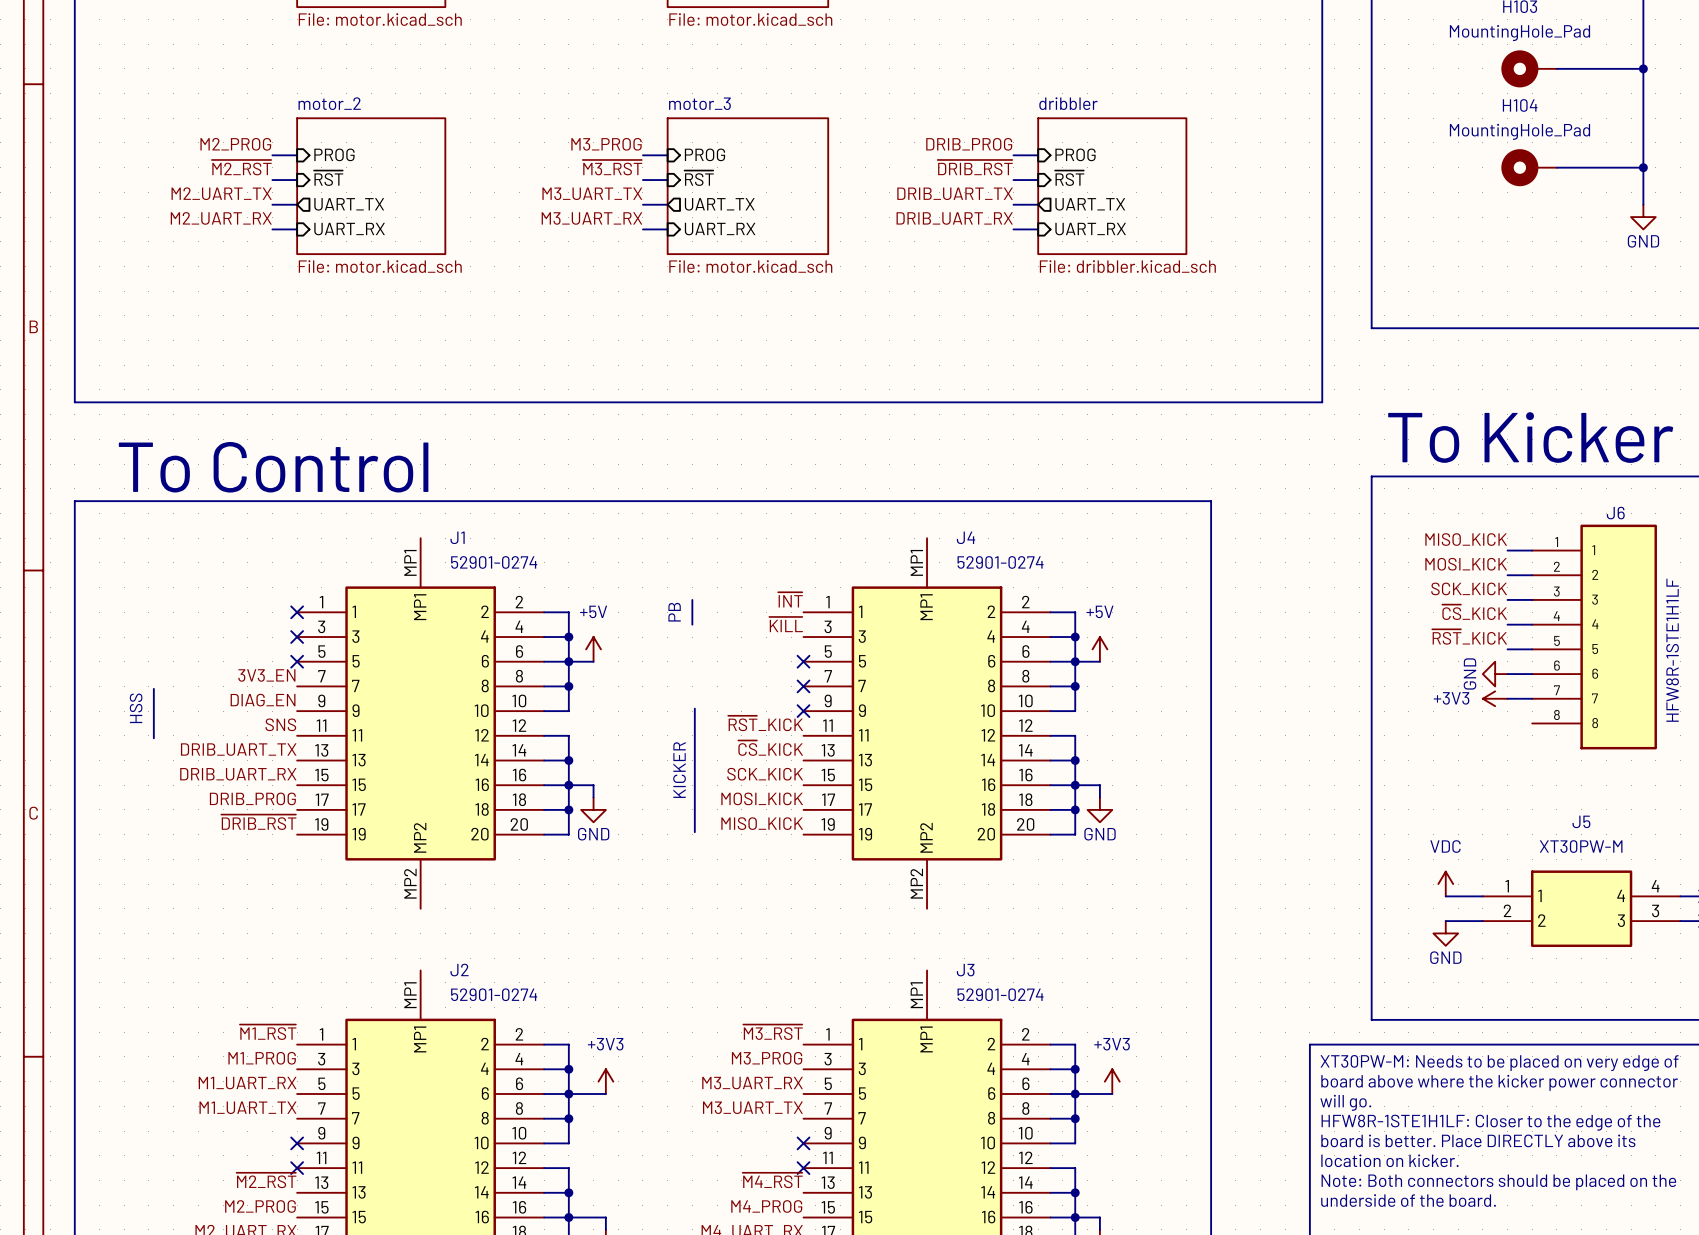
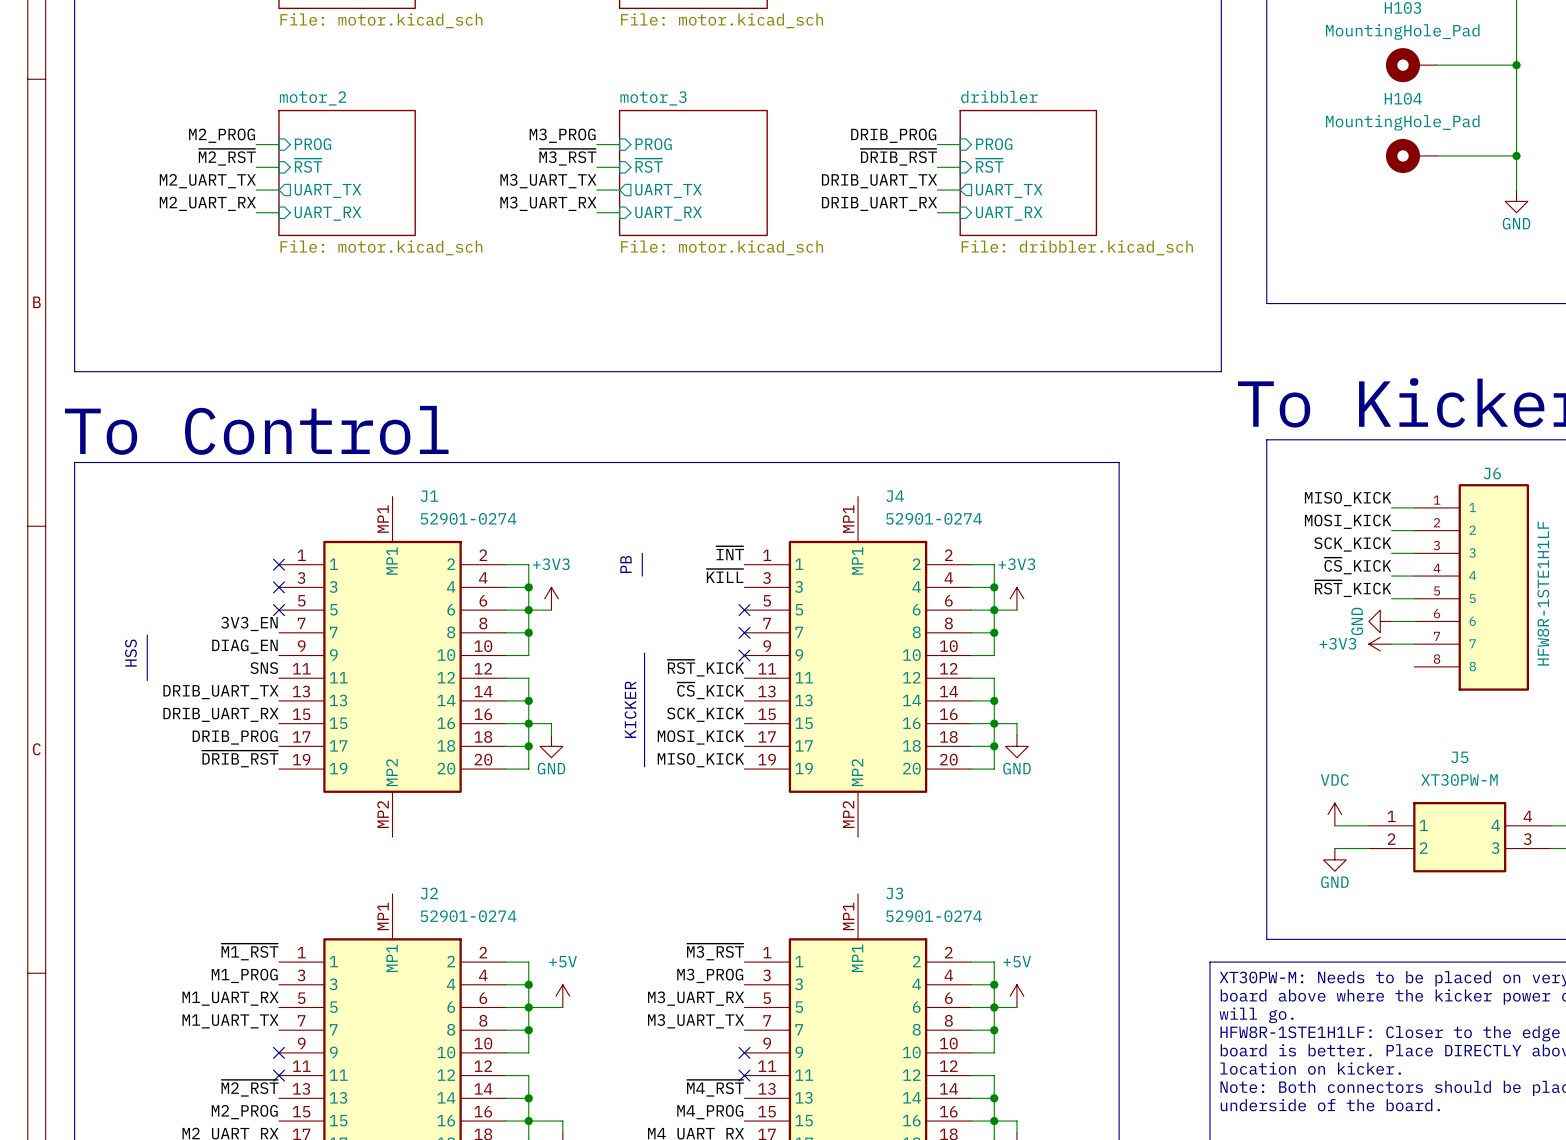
power symbol: +5V (593, 649) -> +3V3 (551, 598)
power symbol: +5V (1099, 649) -> +3V3 (1016, 598)
power symbol: +3V3 (605, 1081) -> +5V (562, 996)
power symbol: none -> +5V (1016, 996)
power symbol: +3V3 (1112, 1081) -> none
wire: (1099, 1094) (1112, 1094) -> none

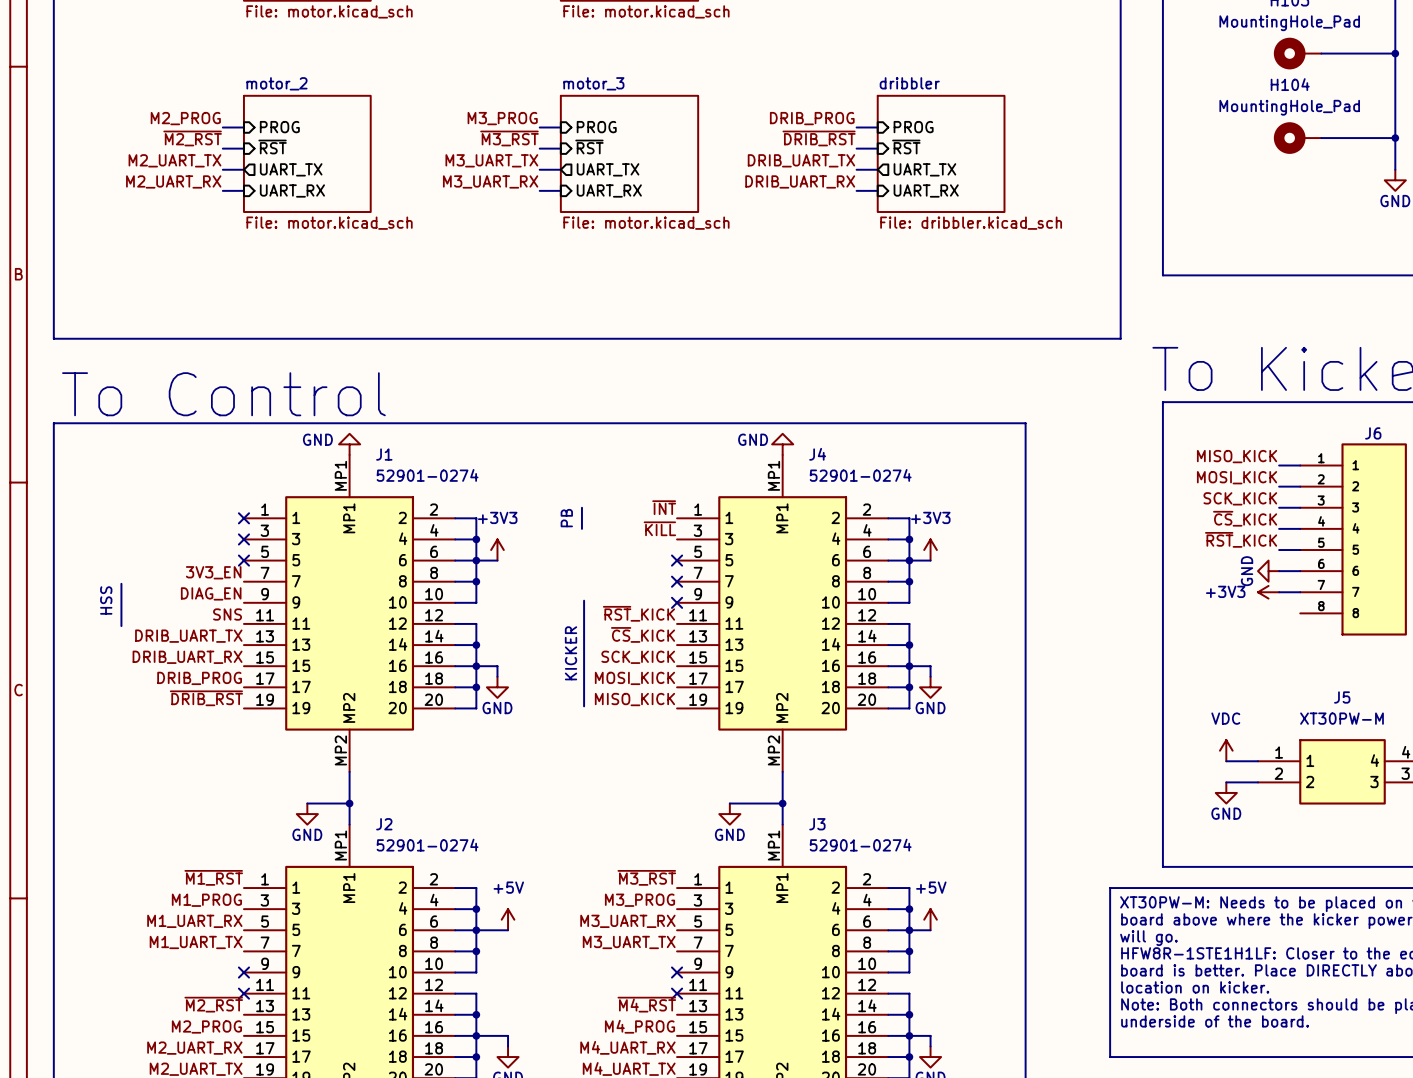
power symbol: none -> GND (349, 444)
power symbol: none -> GND (782, 444)
wire: none -> (349, 771) (349, 824)
wire: none -> (782, 771) (782, 824)
wire: none -> (307, 803) (349, 803)
junction: none -> (349, 803)
wire: none -> (729, 803) (782, 803)
junction: none -> (782, 803)
power symbol: none -> GND (307, 814)
power symbol: none -> GND (729, 814)

